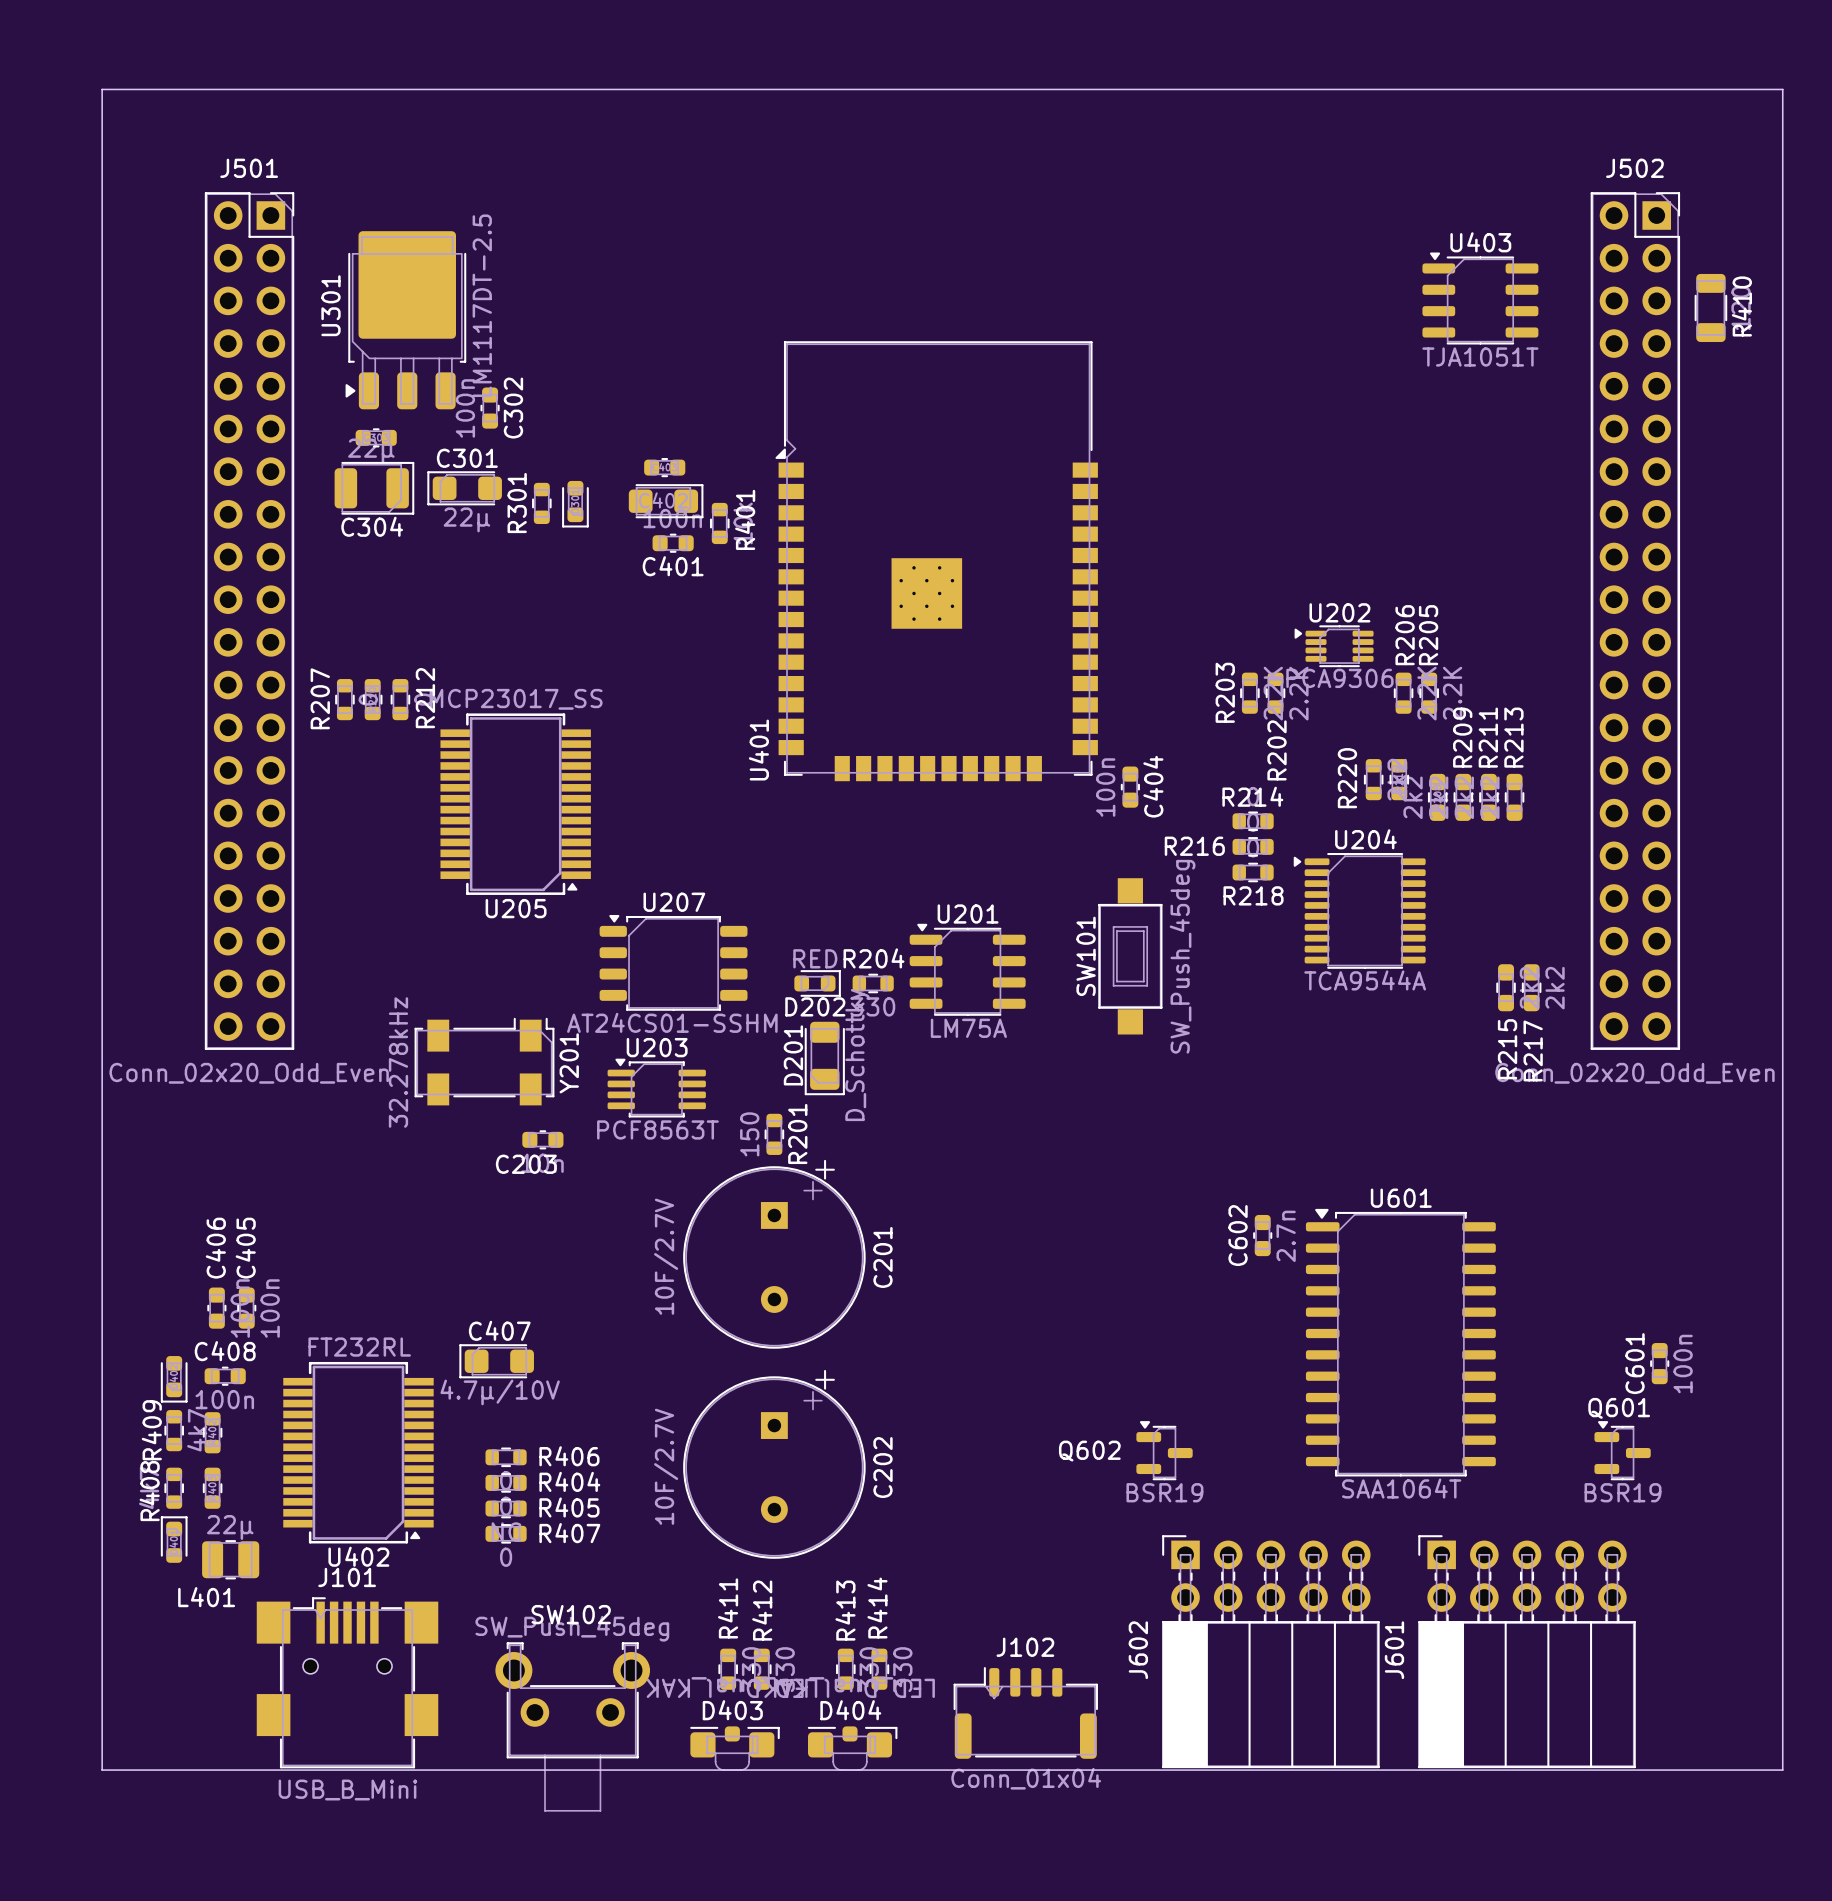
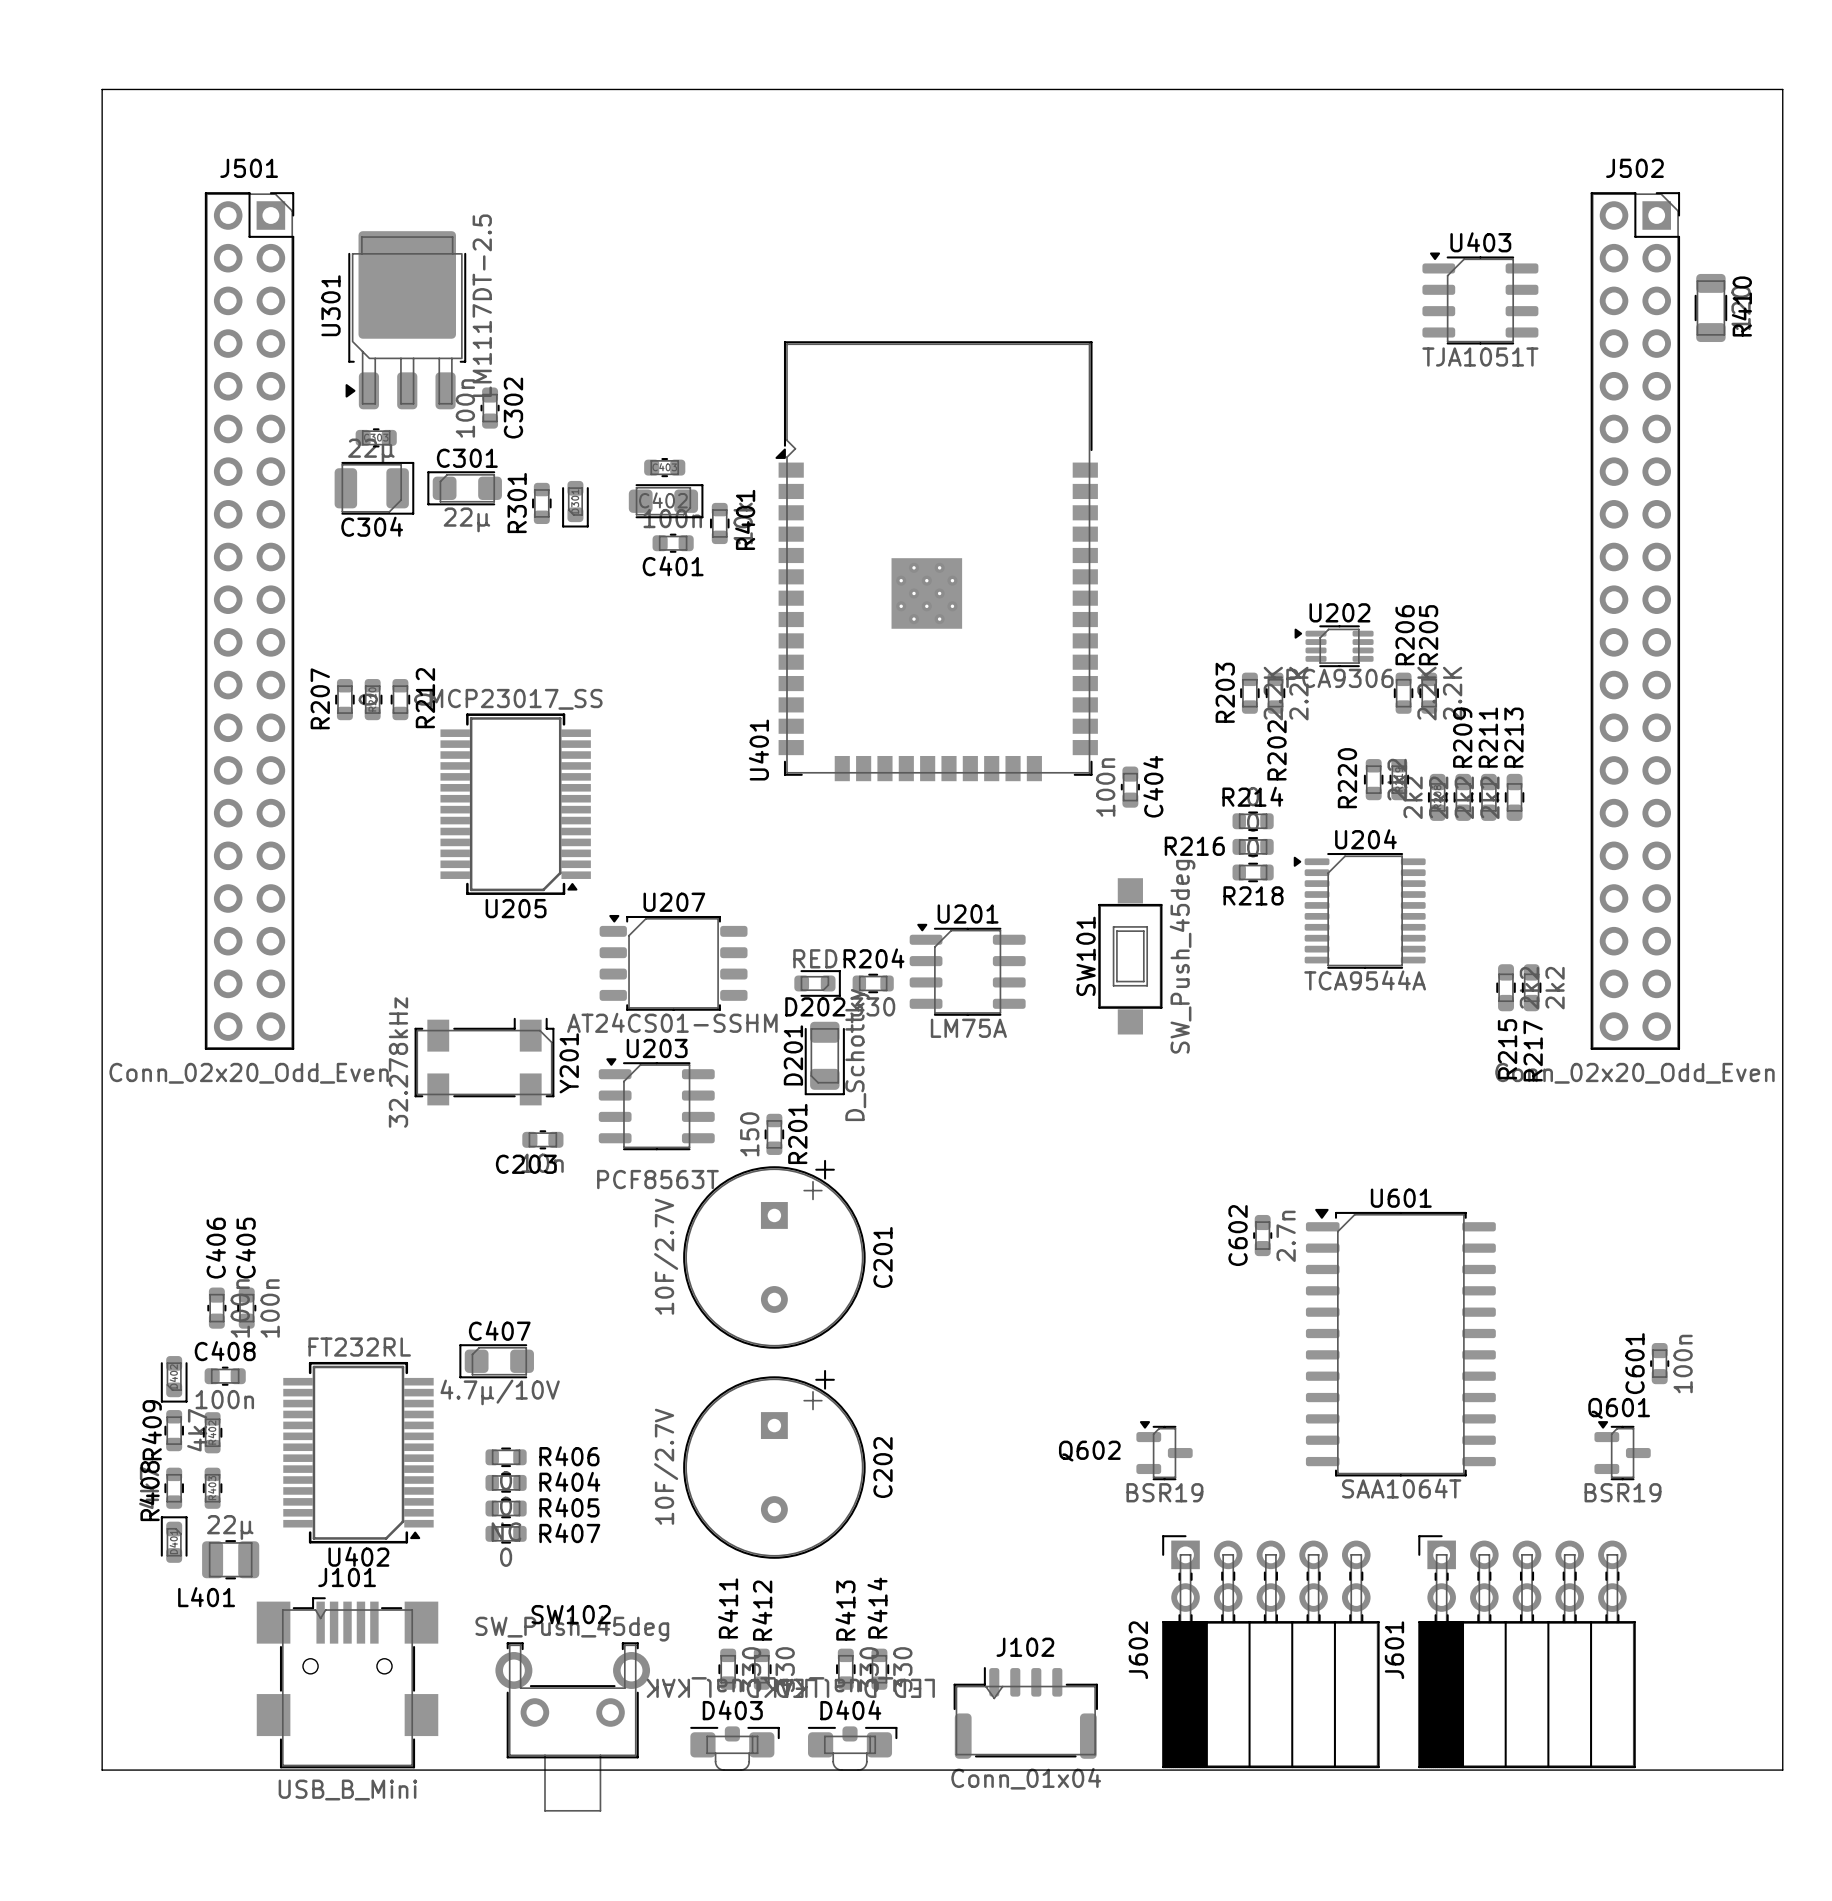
U203 footprint: [607, 1058, 706, 1118] -> [598, 1058, 715, 1151]

